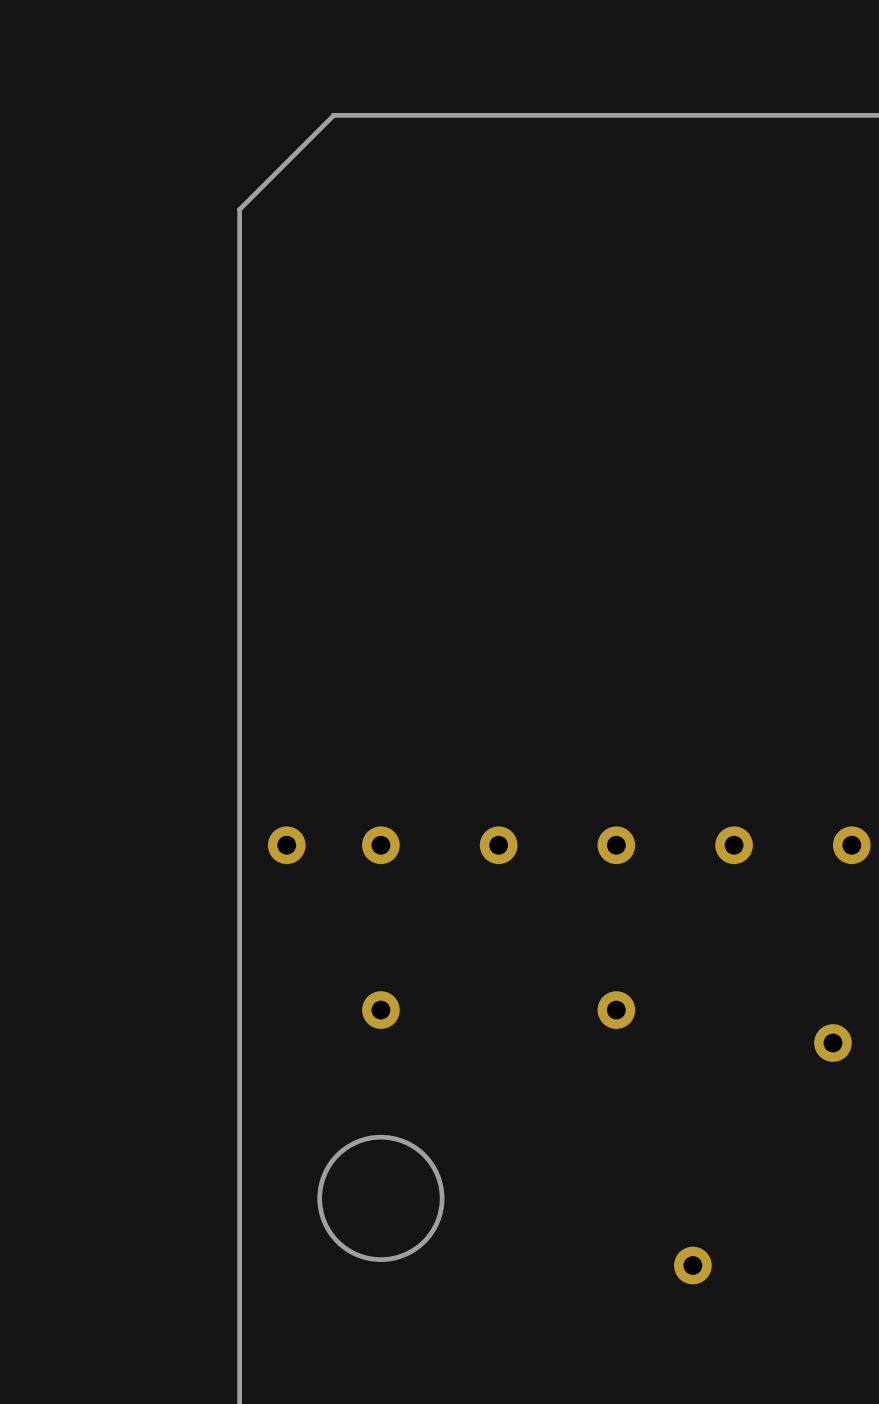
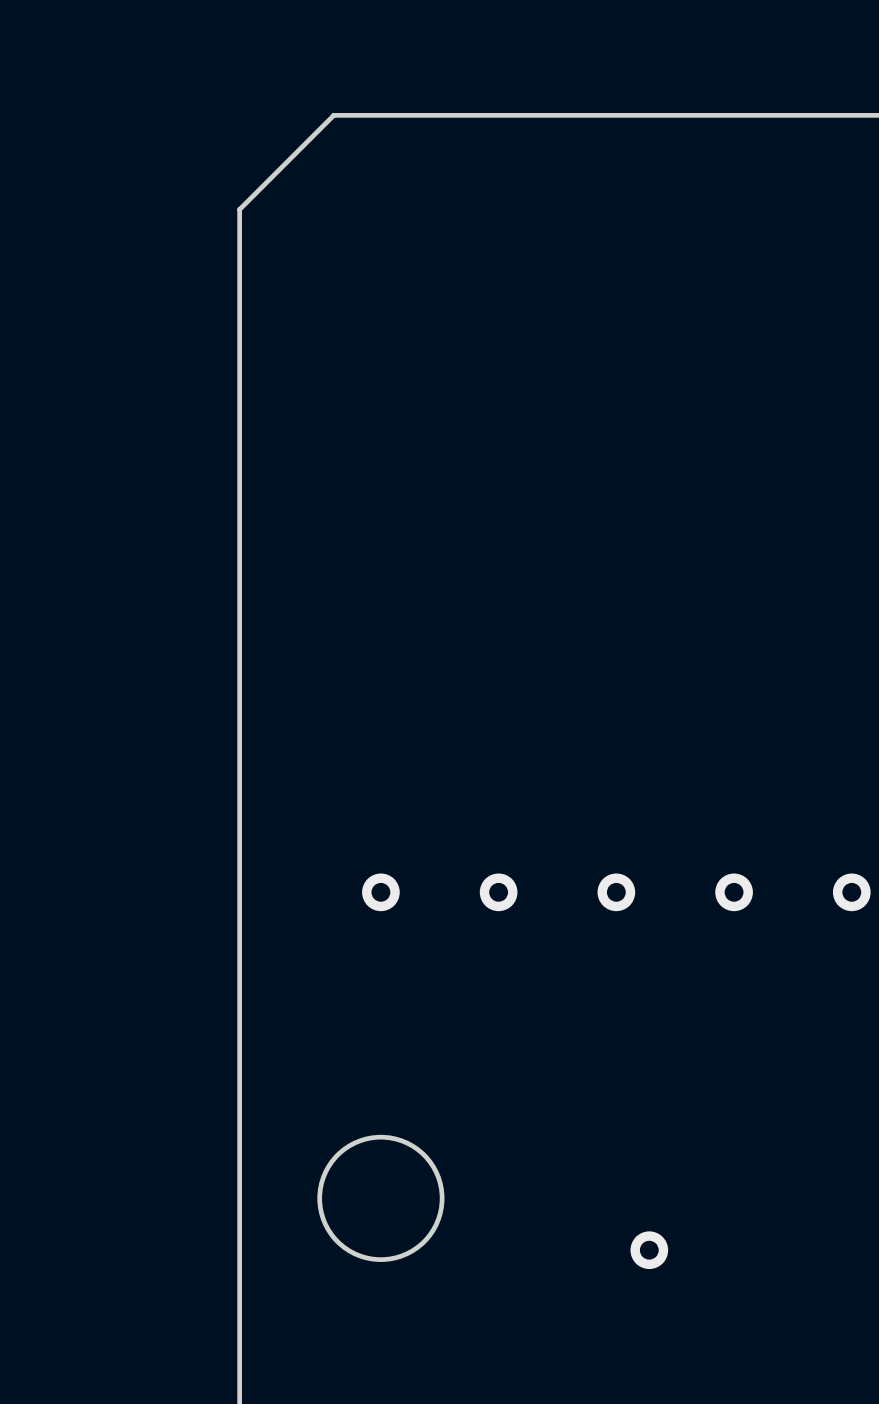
via: (286, 845) -> none
via position: (380, 845) -> (380, 892)
via position: (498, 845) -> (498, 892)
via position: (616, 845) -> (616, 892)
via position: (734, 845) -> (734, 892)
via position: (851, 845) -> (851, 892)
via: (380, 1010) -> none
via: (616, 1010) -> none
via: (832, 1043) -> none
via position: (692, 1265) -> (649, 1250)

